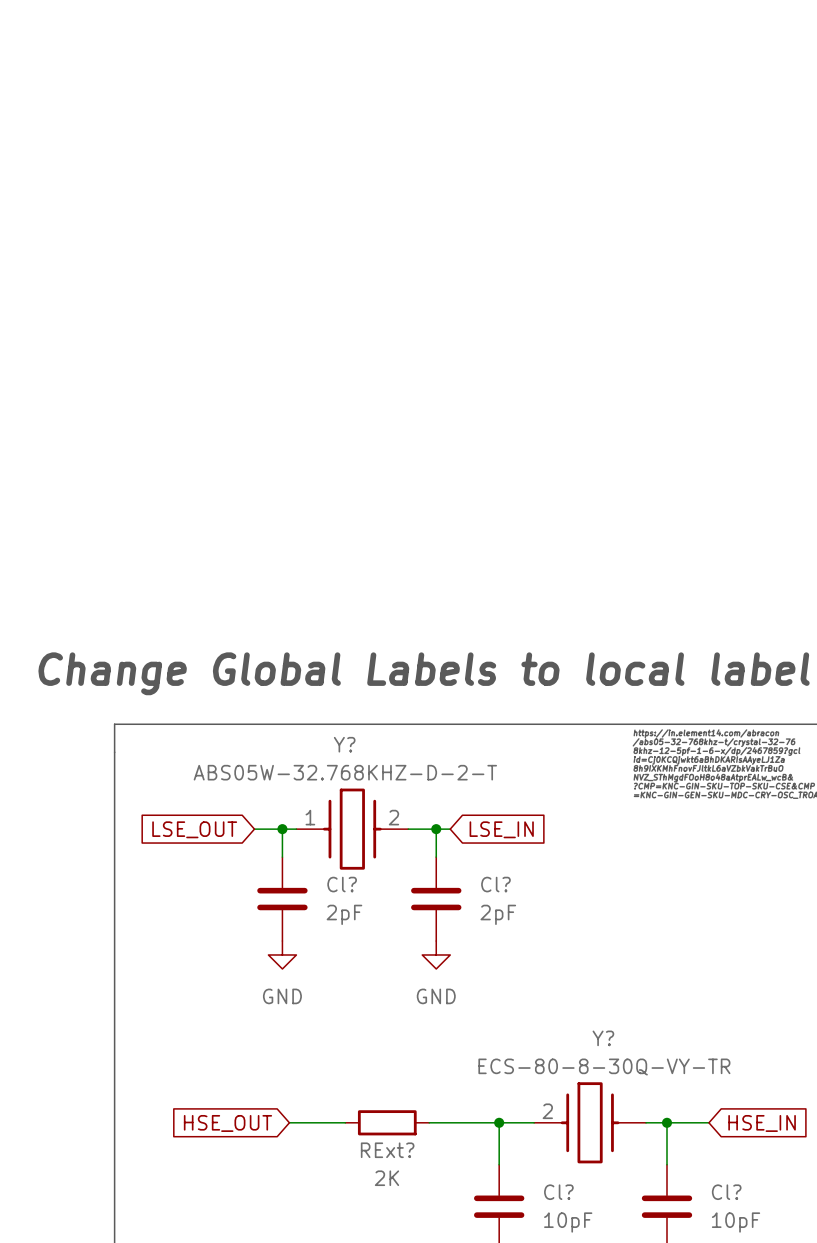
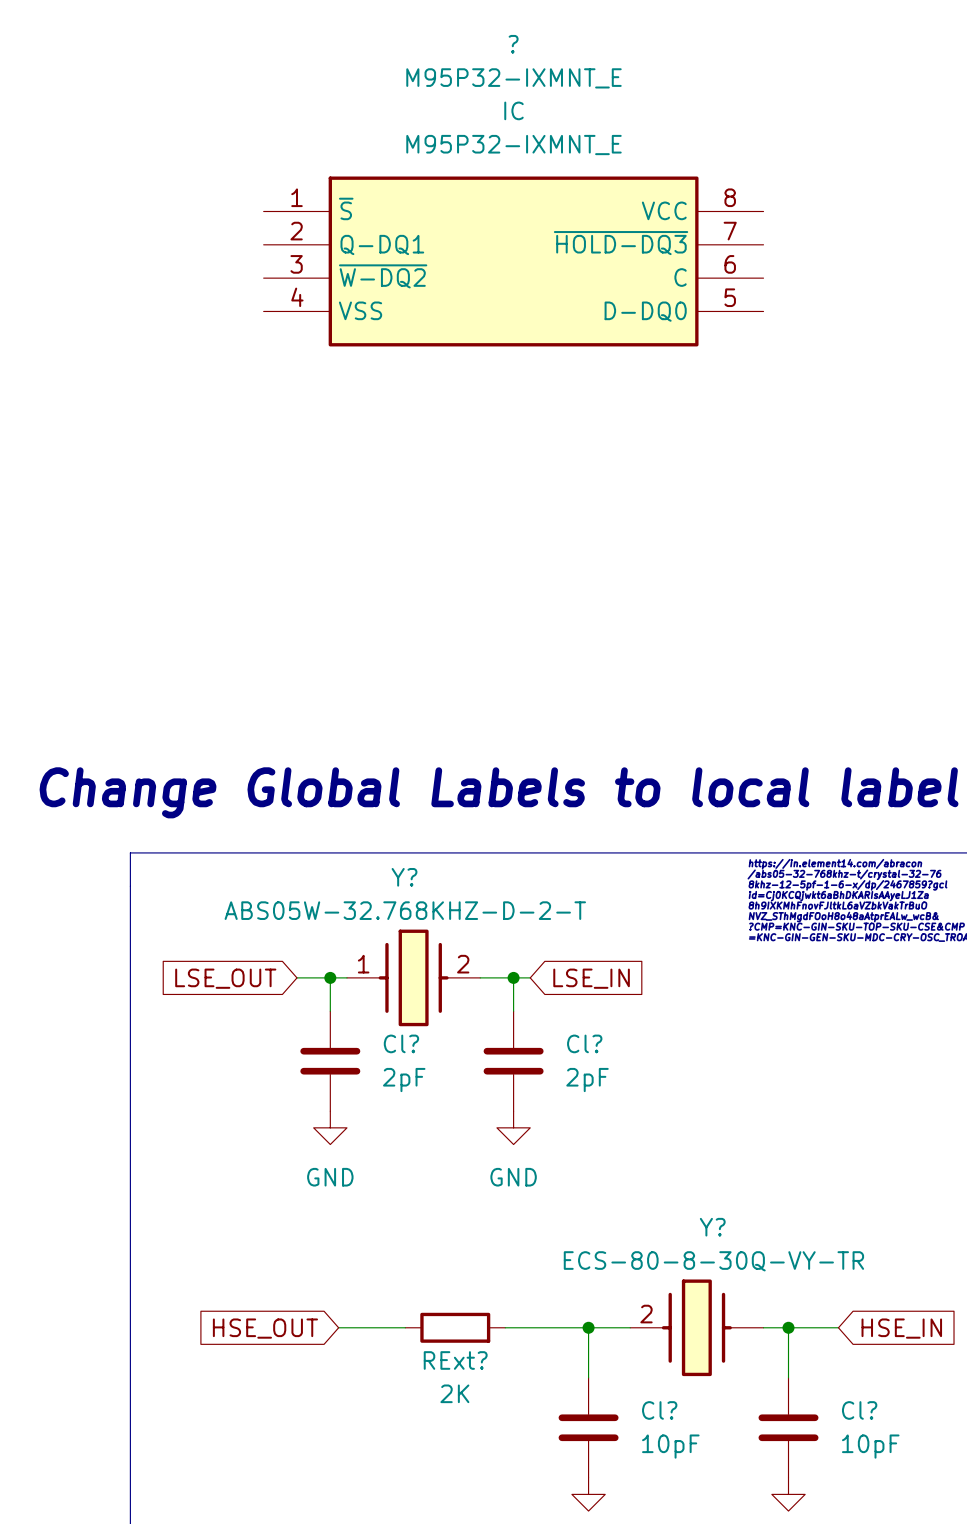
part: none -> M95P32-IXMNT_E (513, 261)

